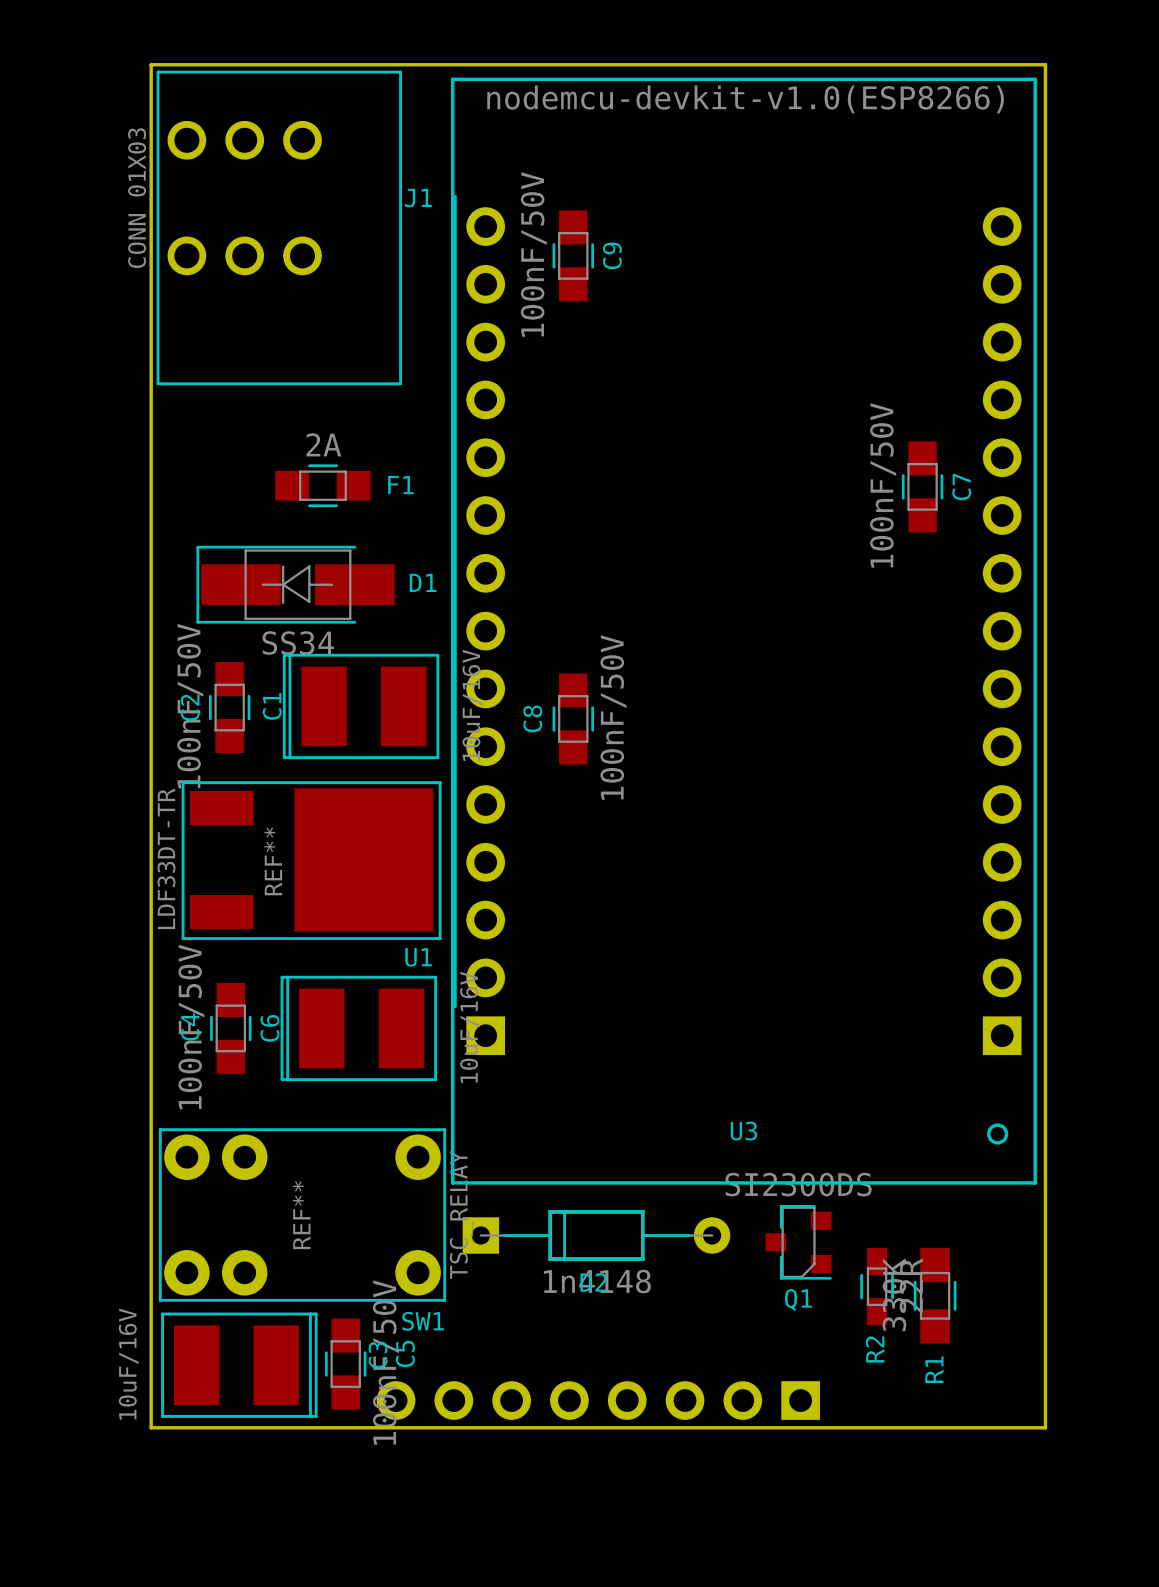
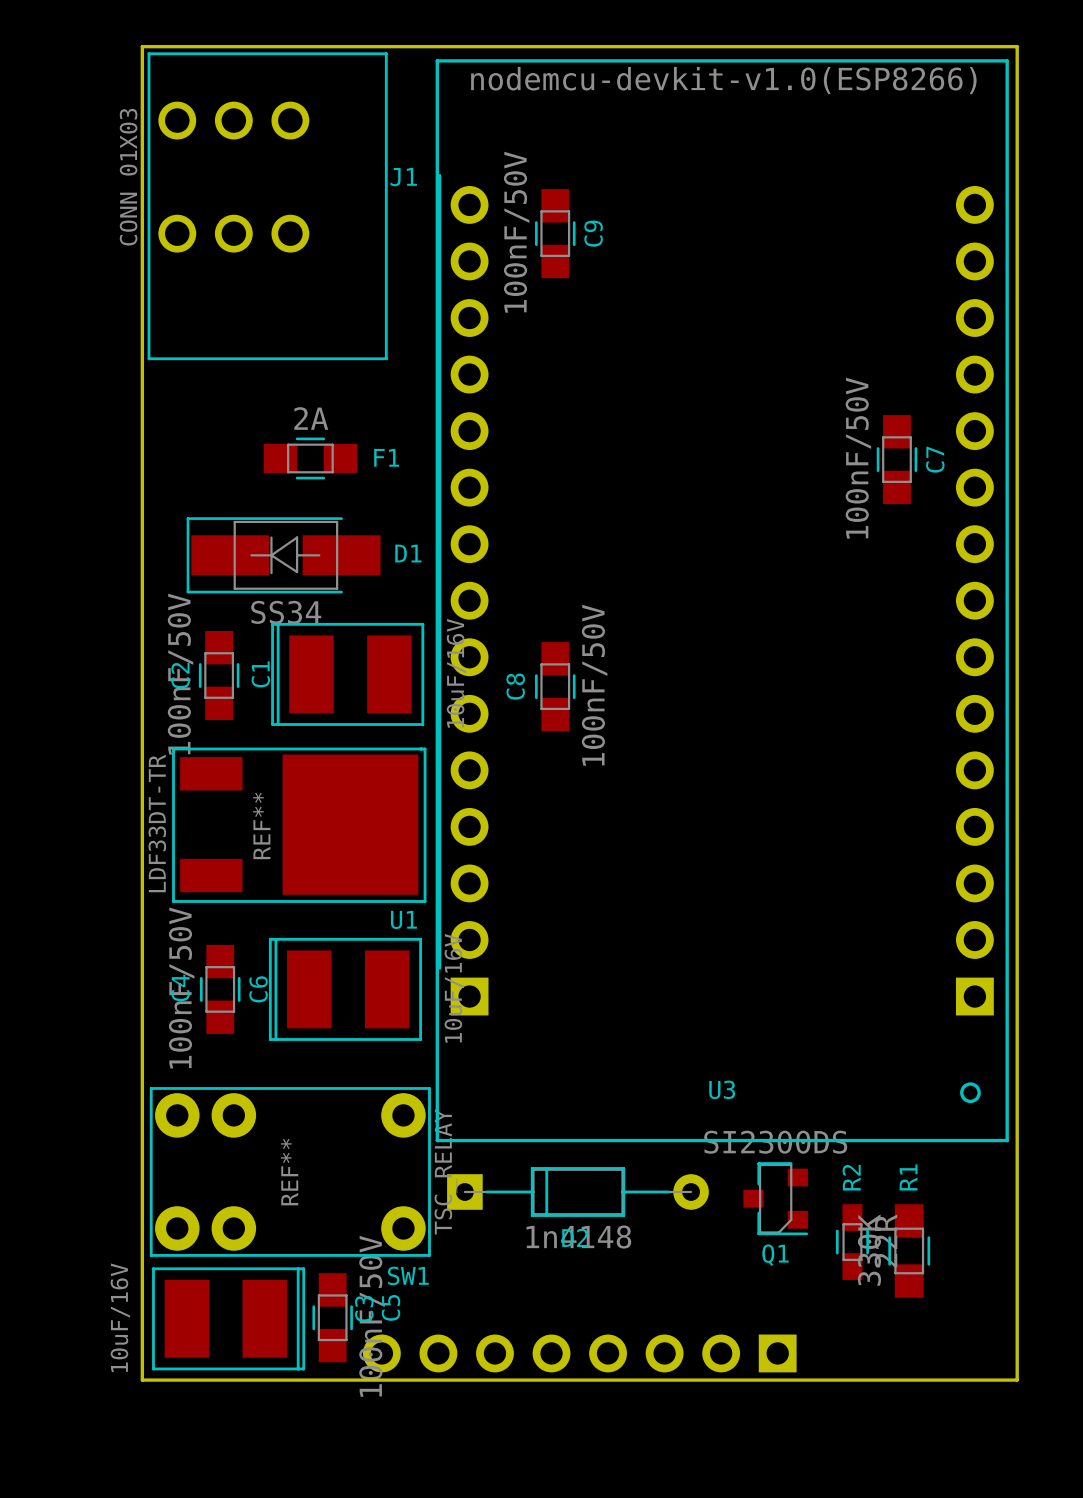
R2 name position: R2 (875, 1349) -> R2 (851, 1177)
R1 name position: R1 (934, 1369) -> R1 (908, 1177)

